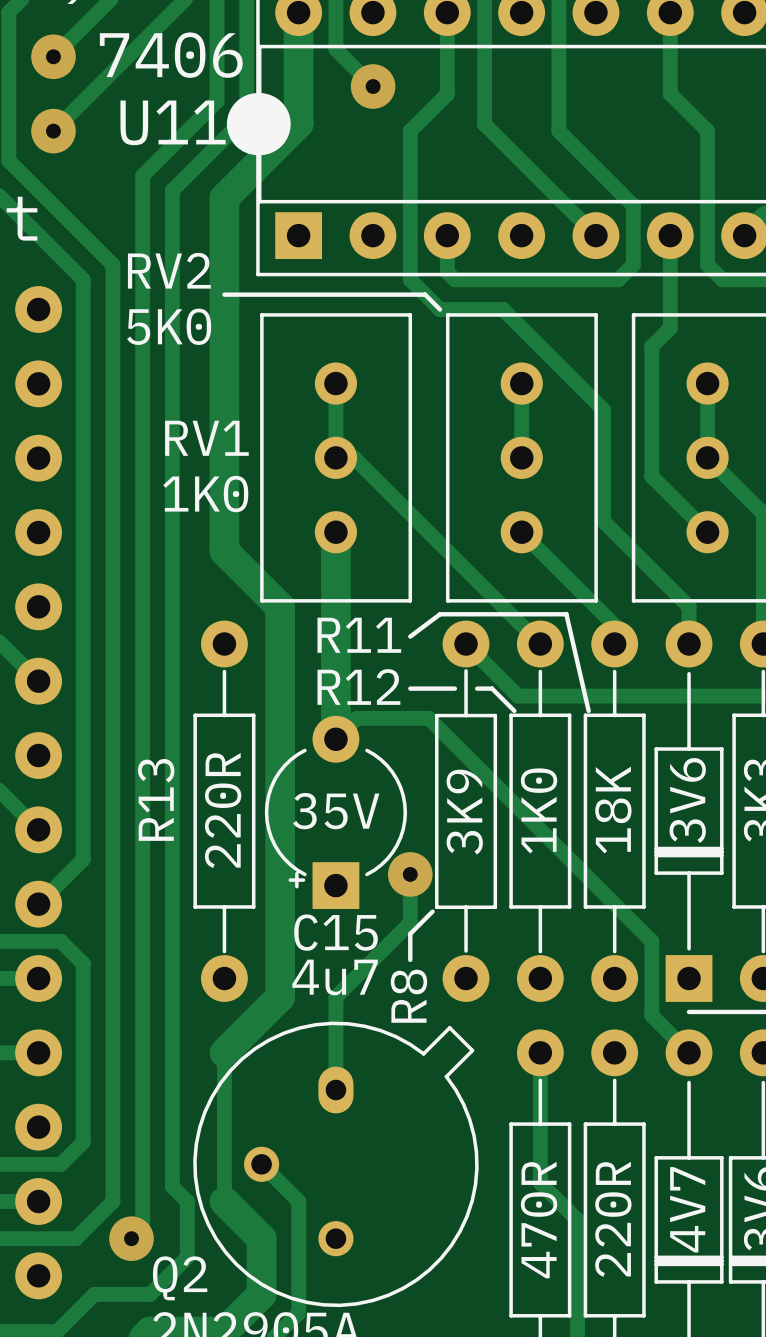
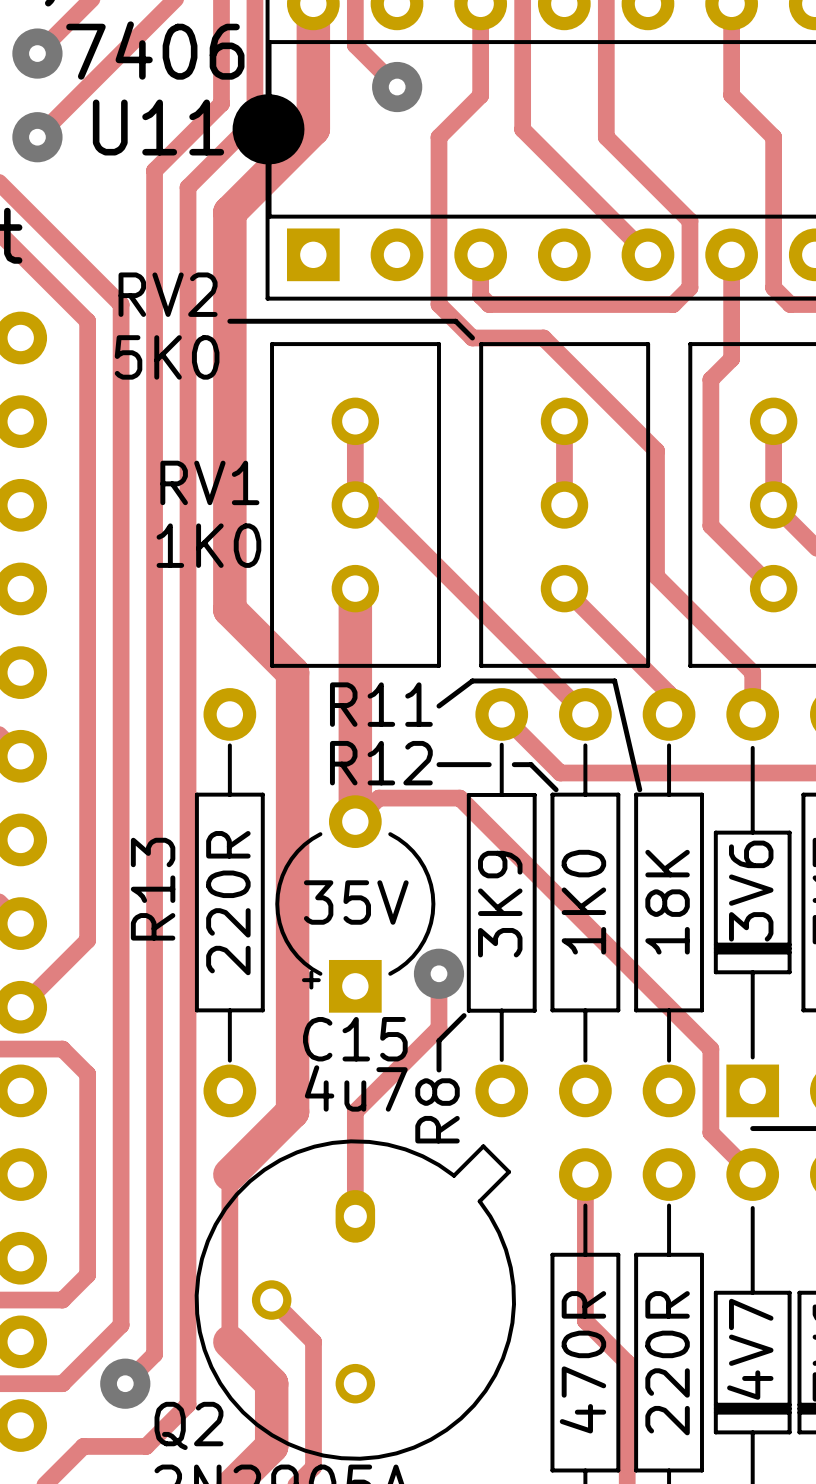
track: (157, 160) (142, 175) (142, 1227) -> (154, 170) (154, 1354) (137, 1371)
track: (187, 175) (172, 190) (172, 1186) (187, 1201) -> (188, 187) (188, 1341)
track: (112, 264) (112, 1201) -> (104, 287) (121, 304) (121, 1325) (104, 1341)
track: (83, 279) (83, 859) -> (70, 304) (87, 321) (87, 940) (70, 957)
track: (60, 941) (83, 963) (83, 1142) (60, 1164) -> (45, 1049) (62, 1049) (87, 1074) (87, 1274) (62, 1300) (45, 1300)

